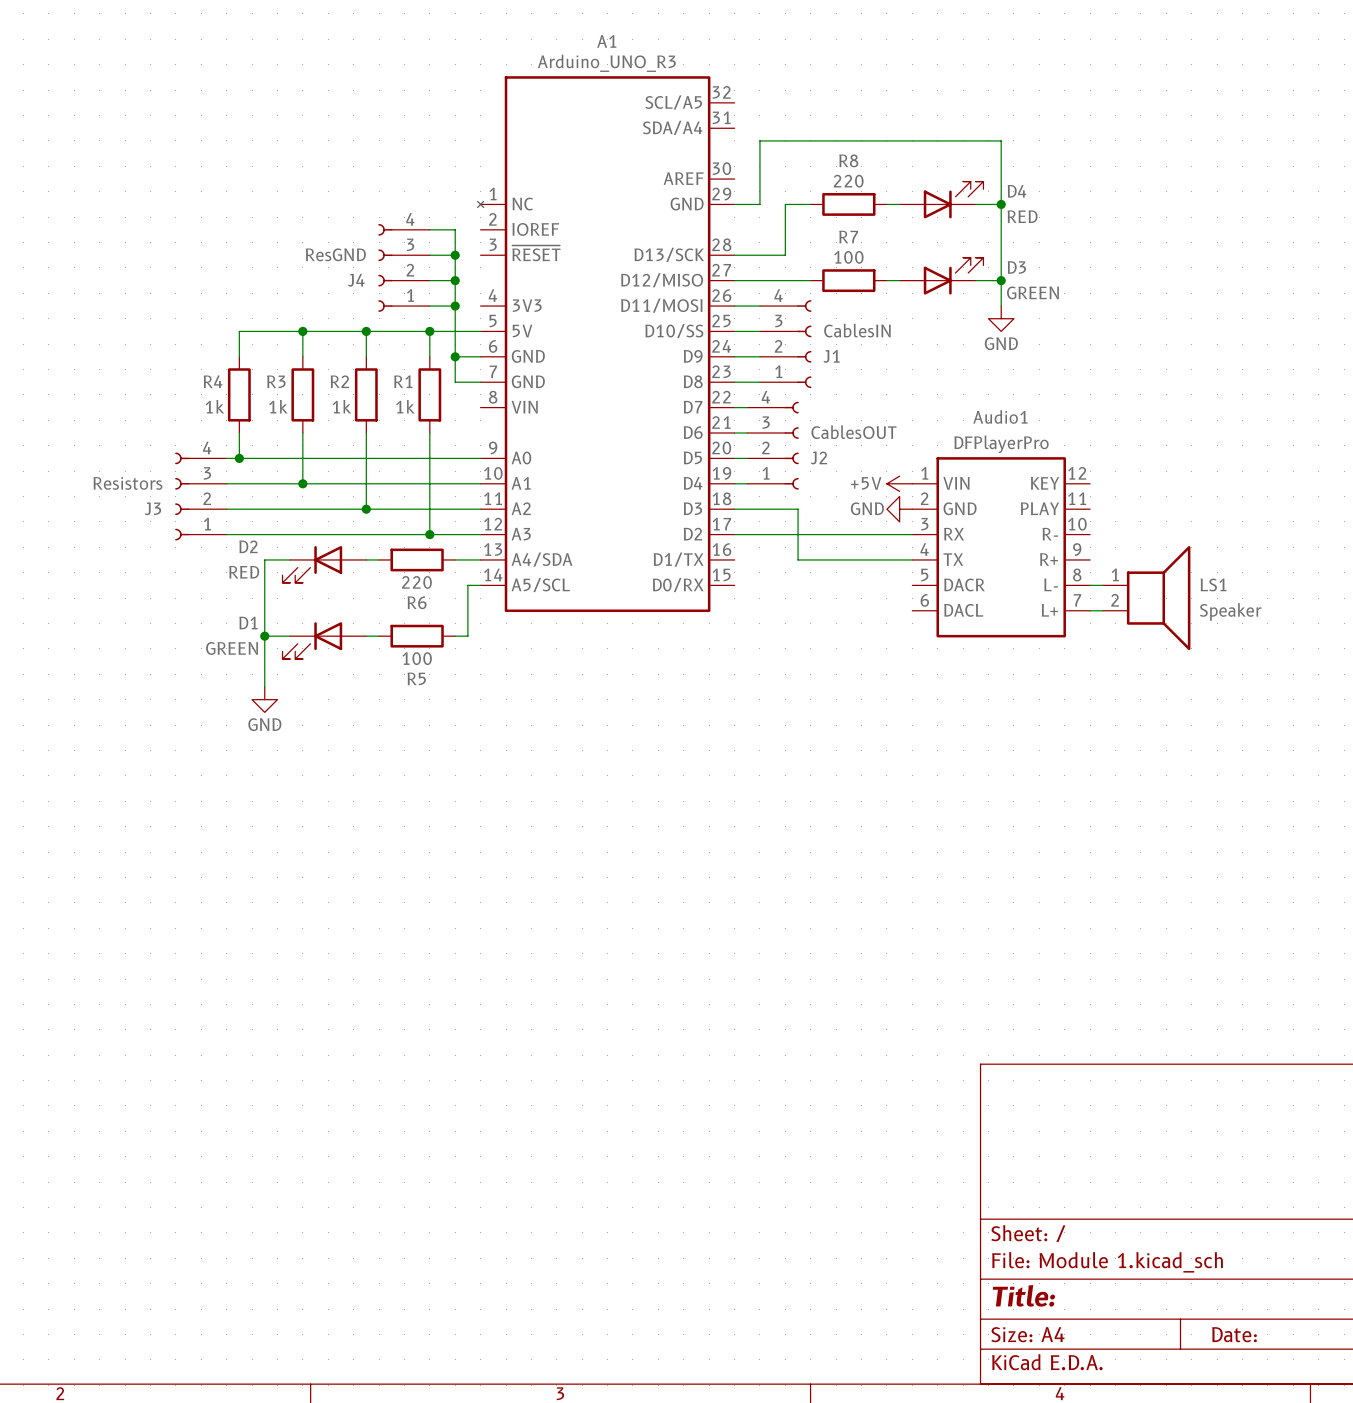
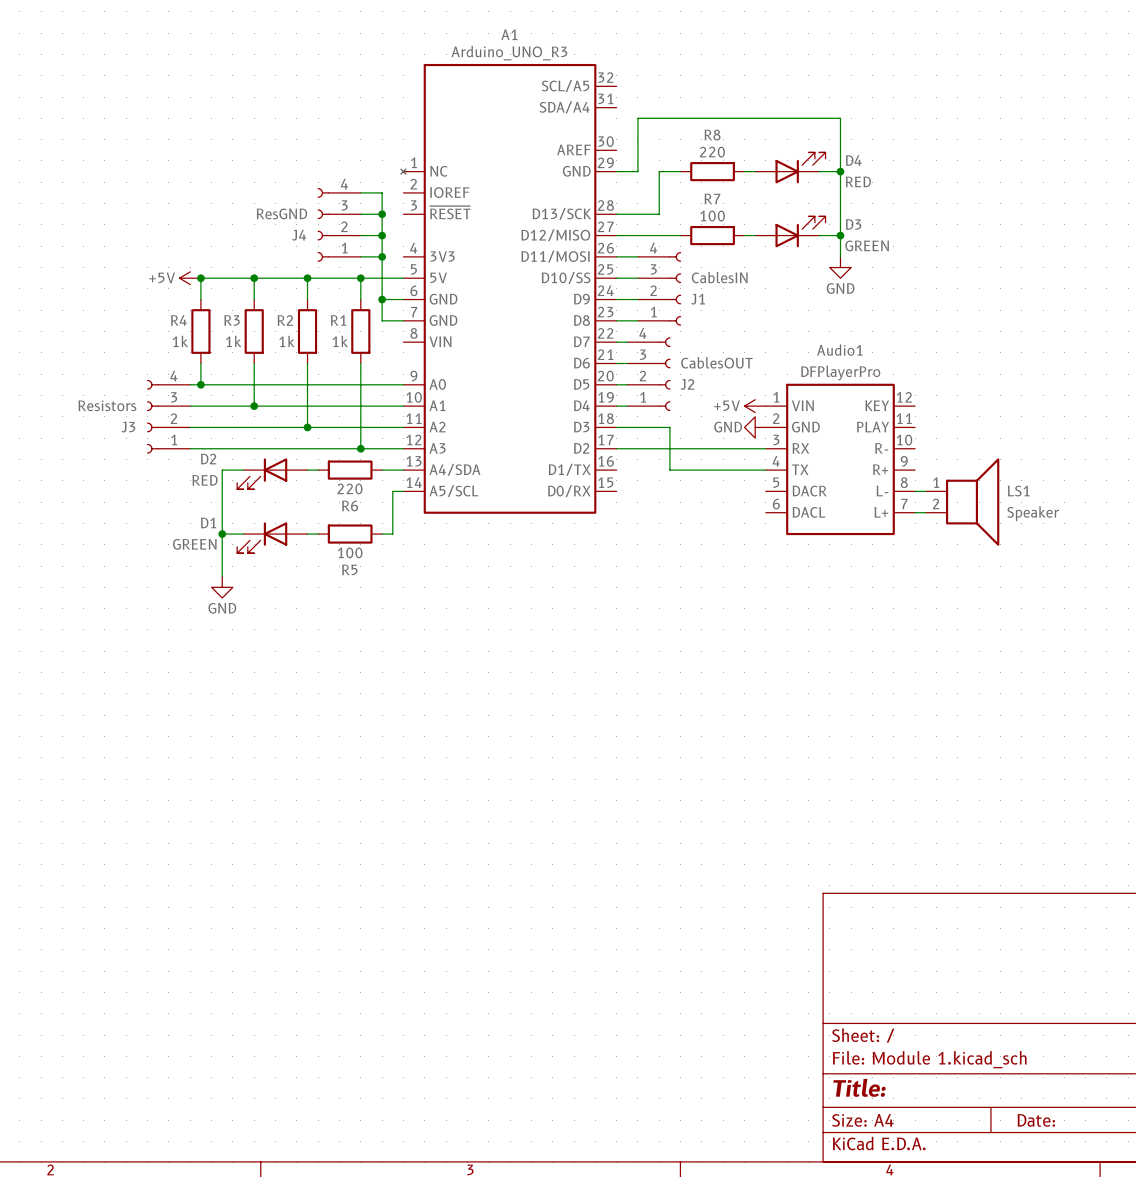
power symbol: none -> +5V (190, 278)
junction: none -> (200, 278)

